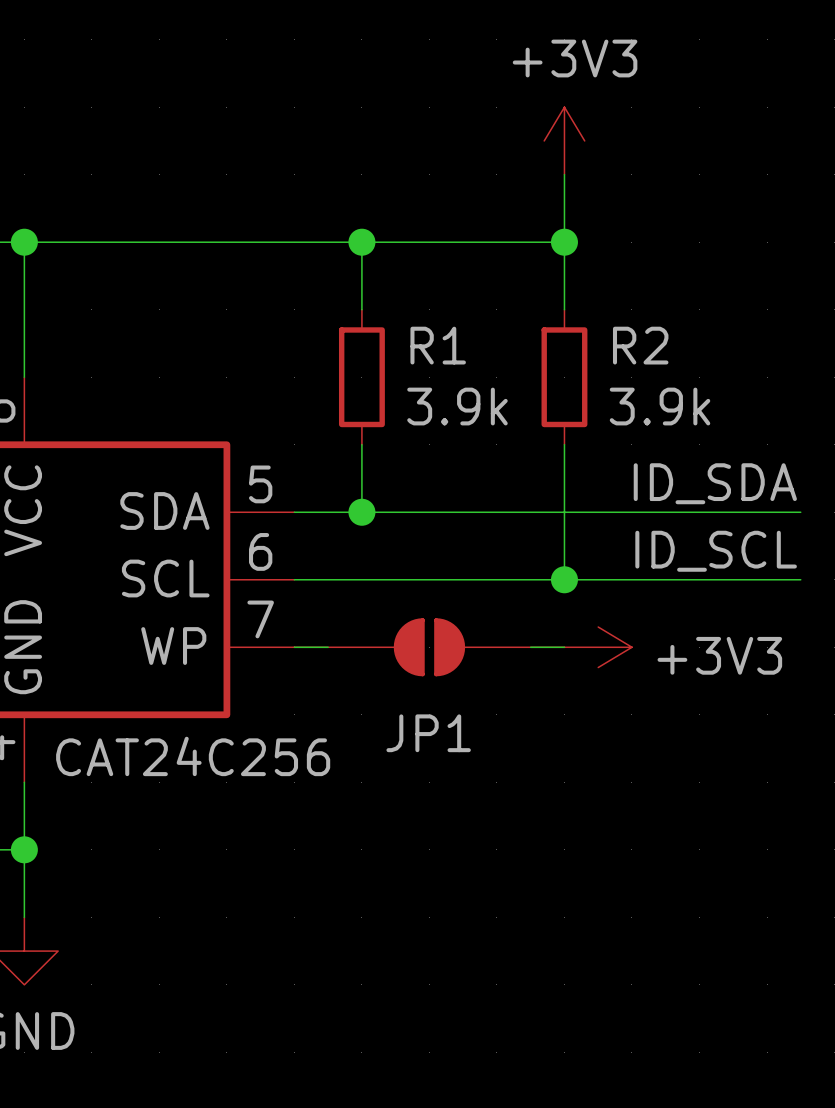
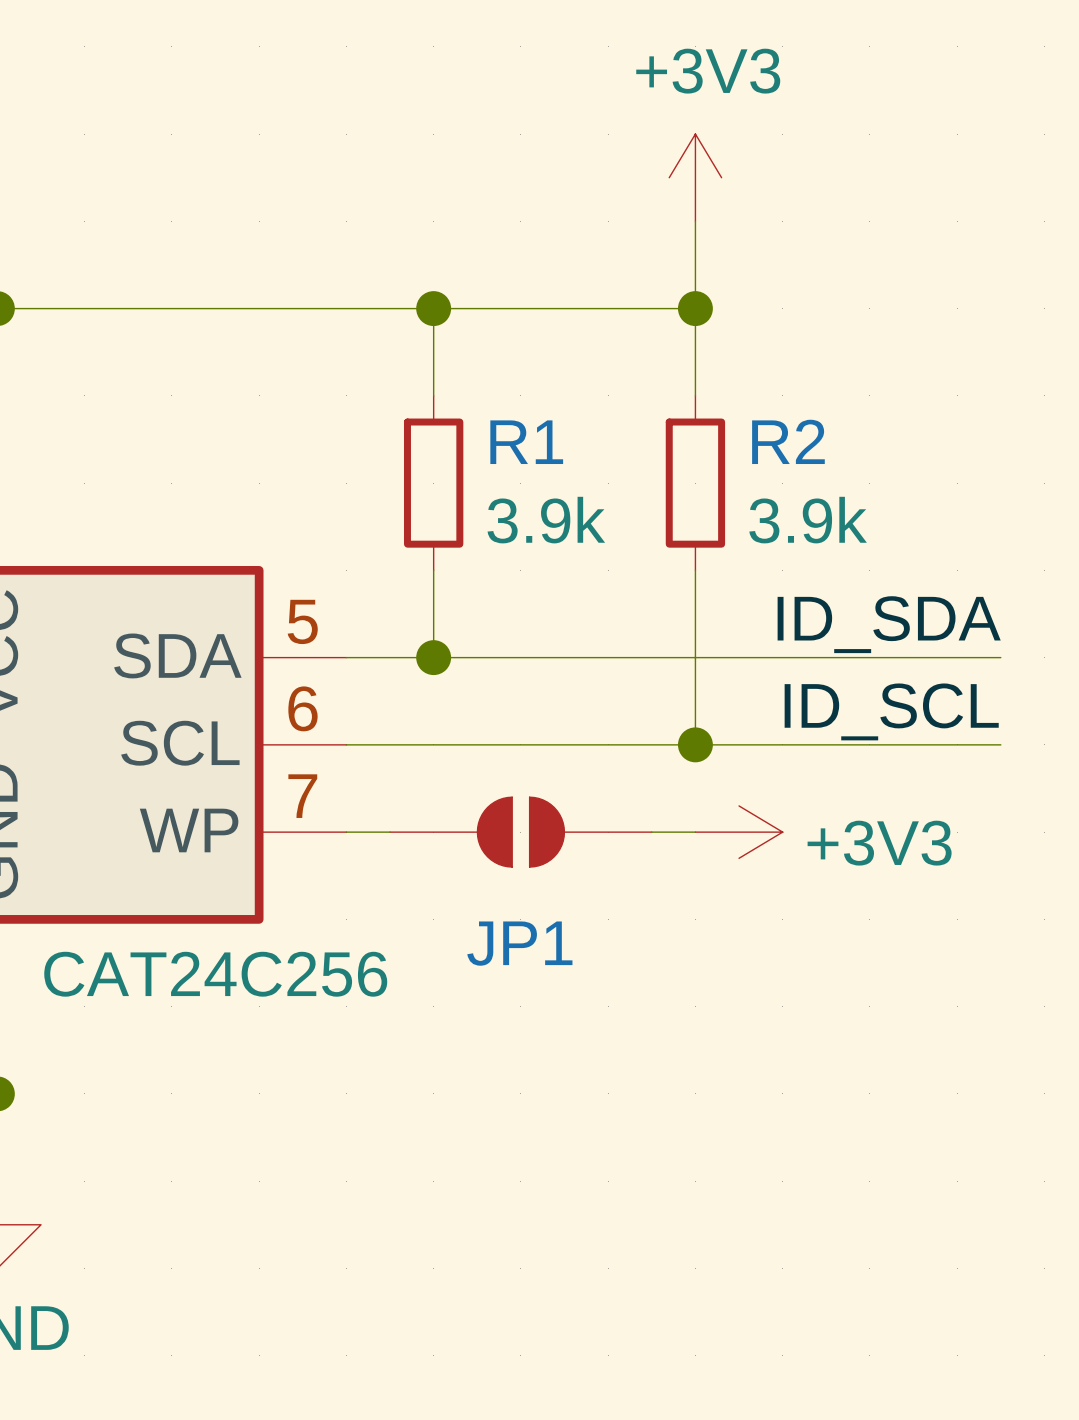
JP1 symbol: [294, 618, 565, 677] -> [390, 797, 652, 868]

